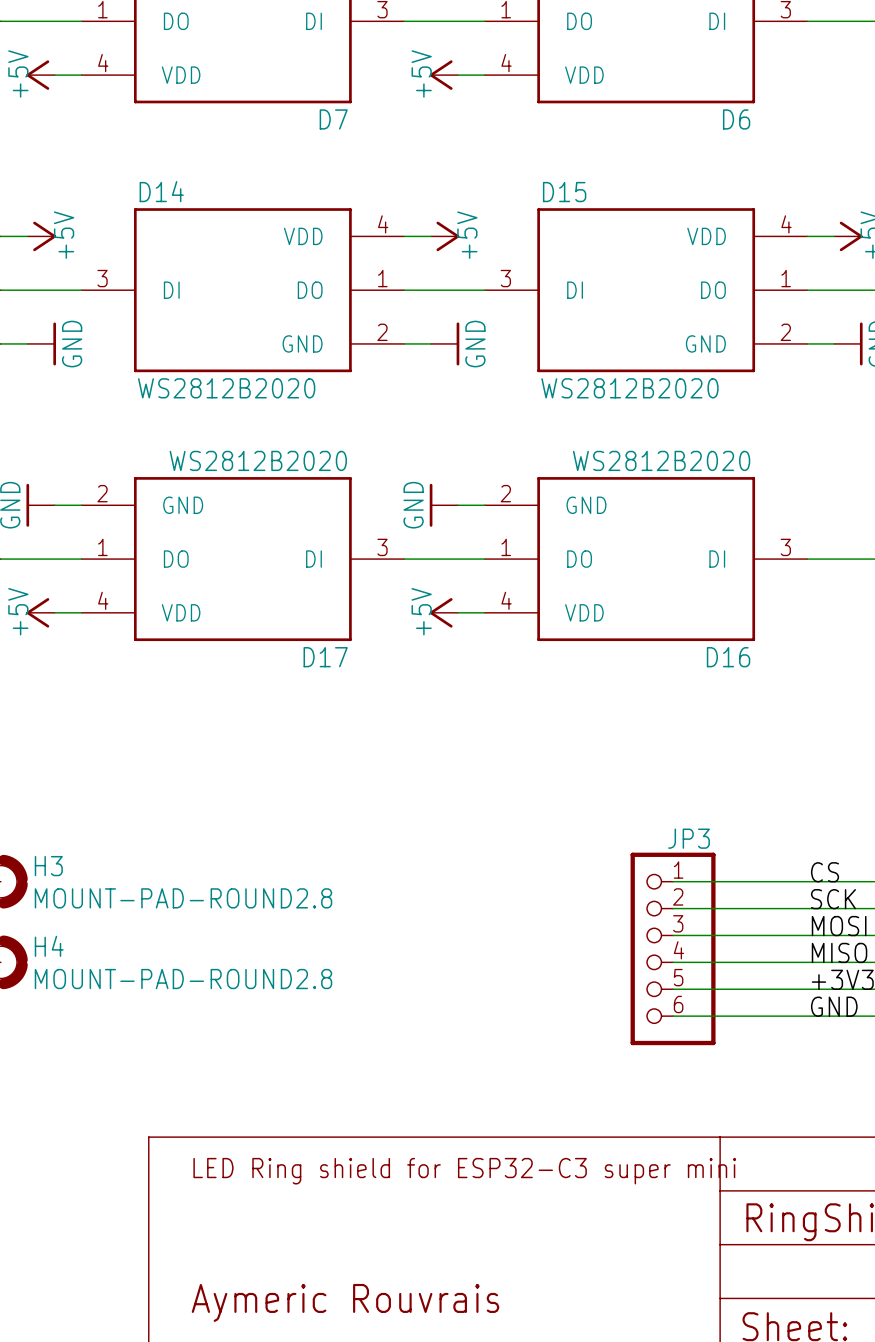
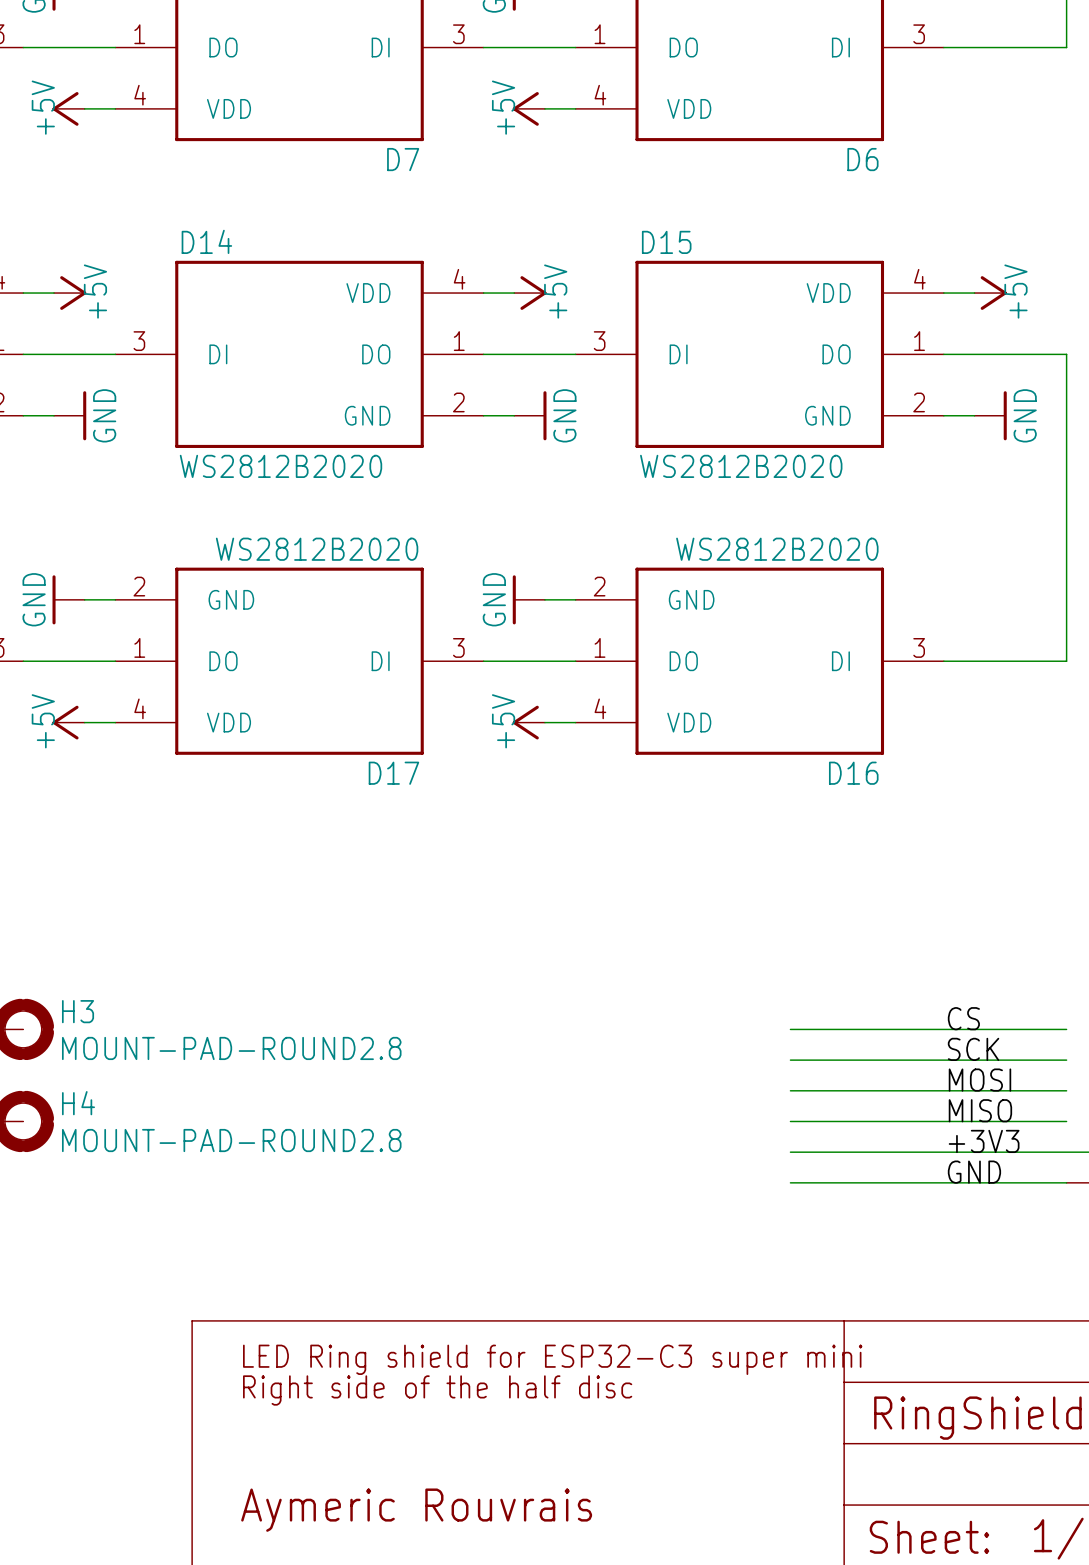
JP3: (673, 948) -> none
text: none -> Right side of the half disc (437, 1390)

